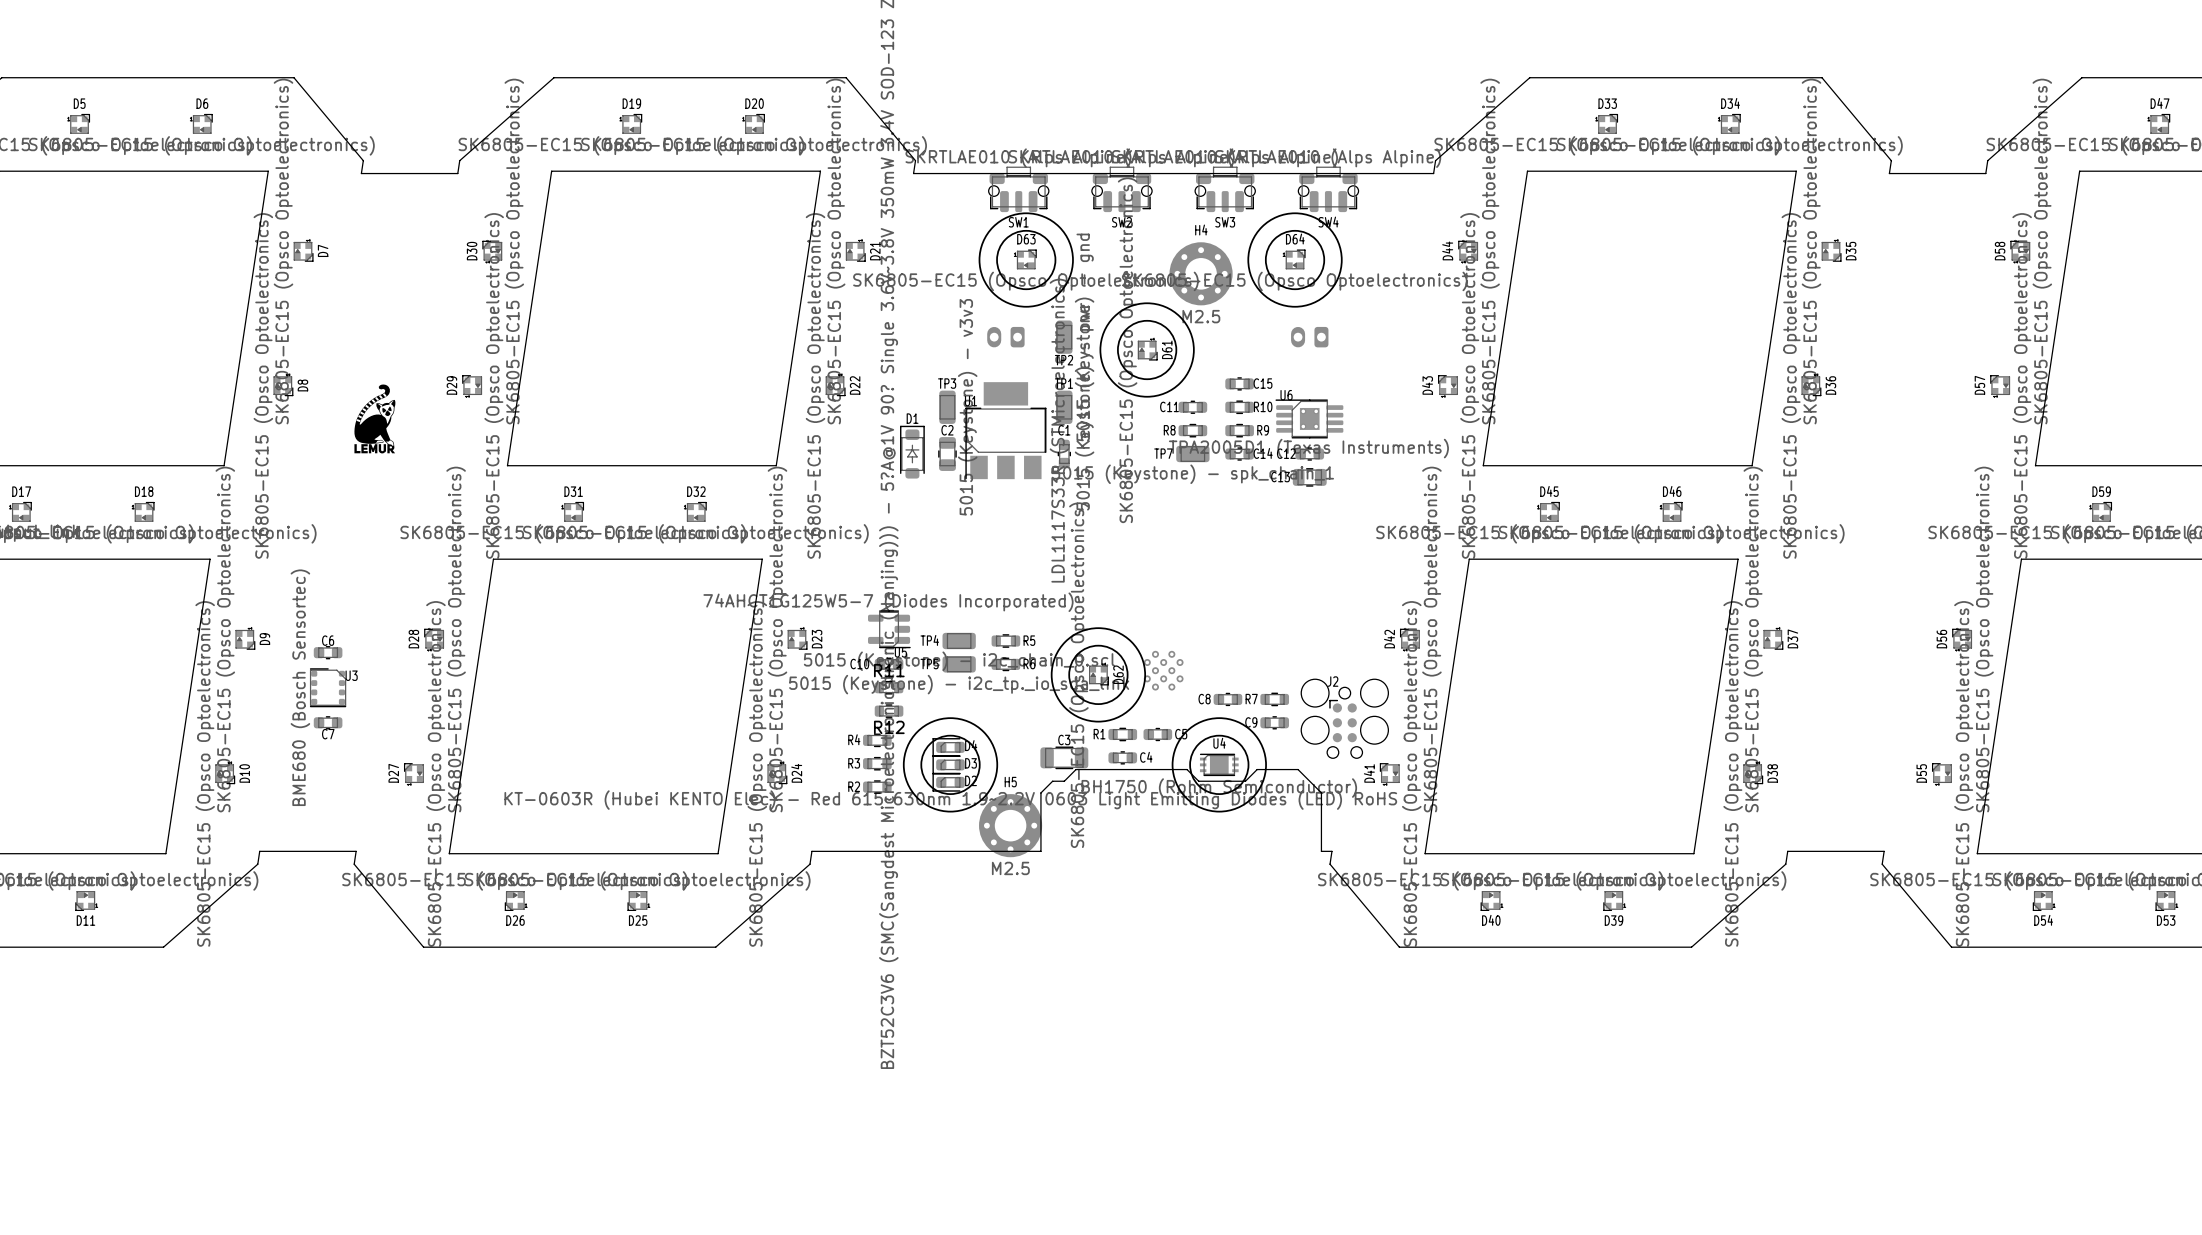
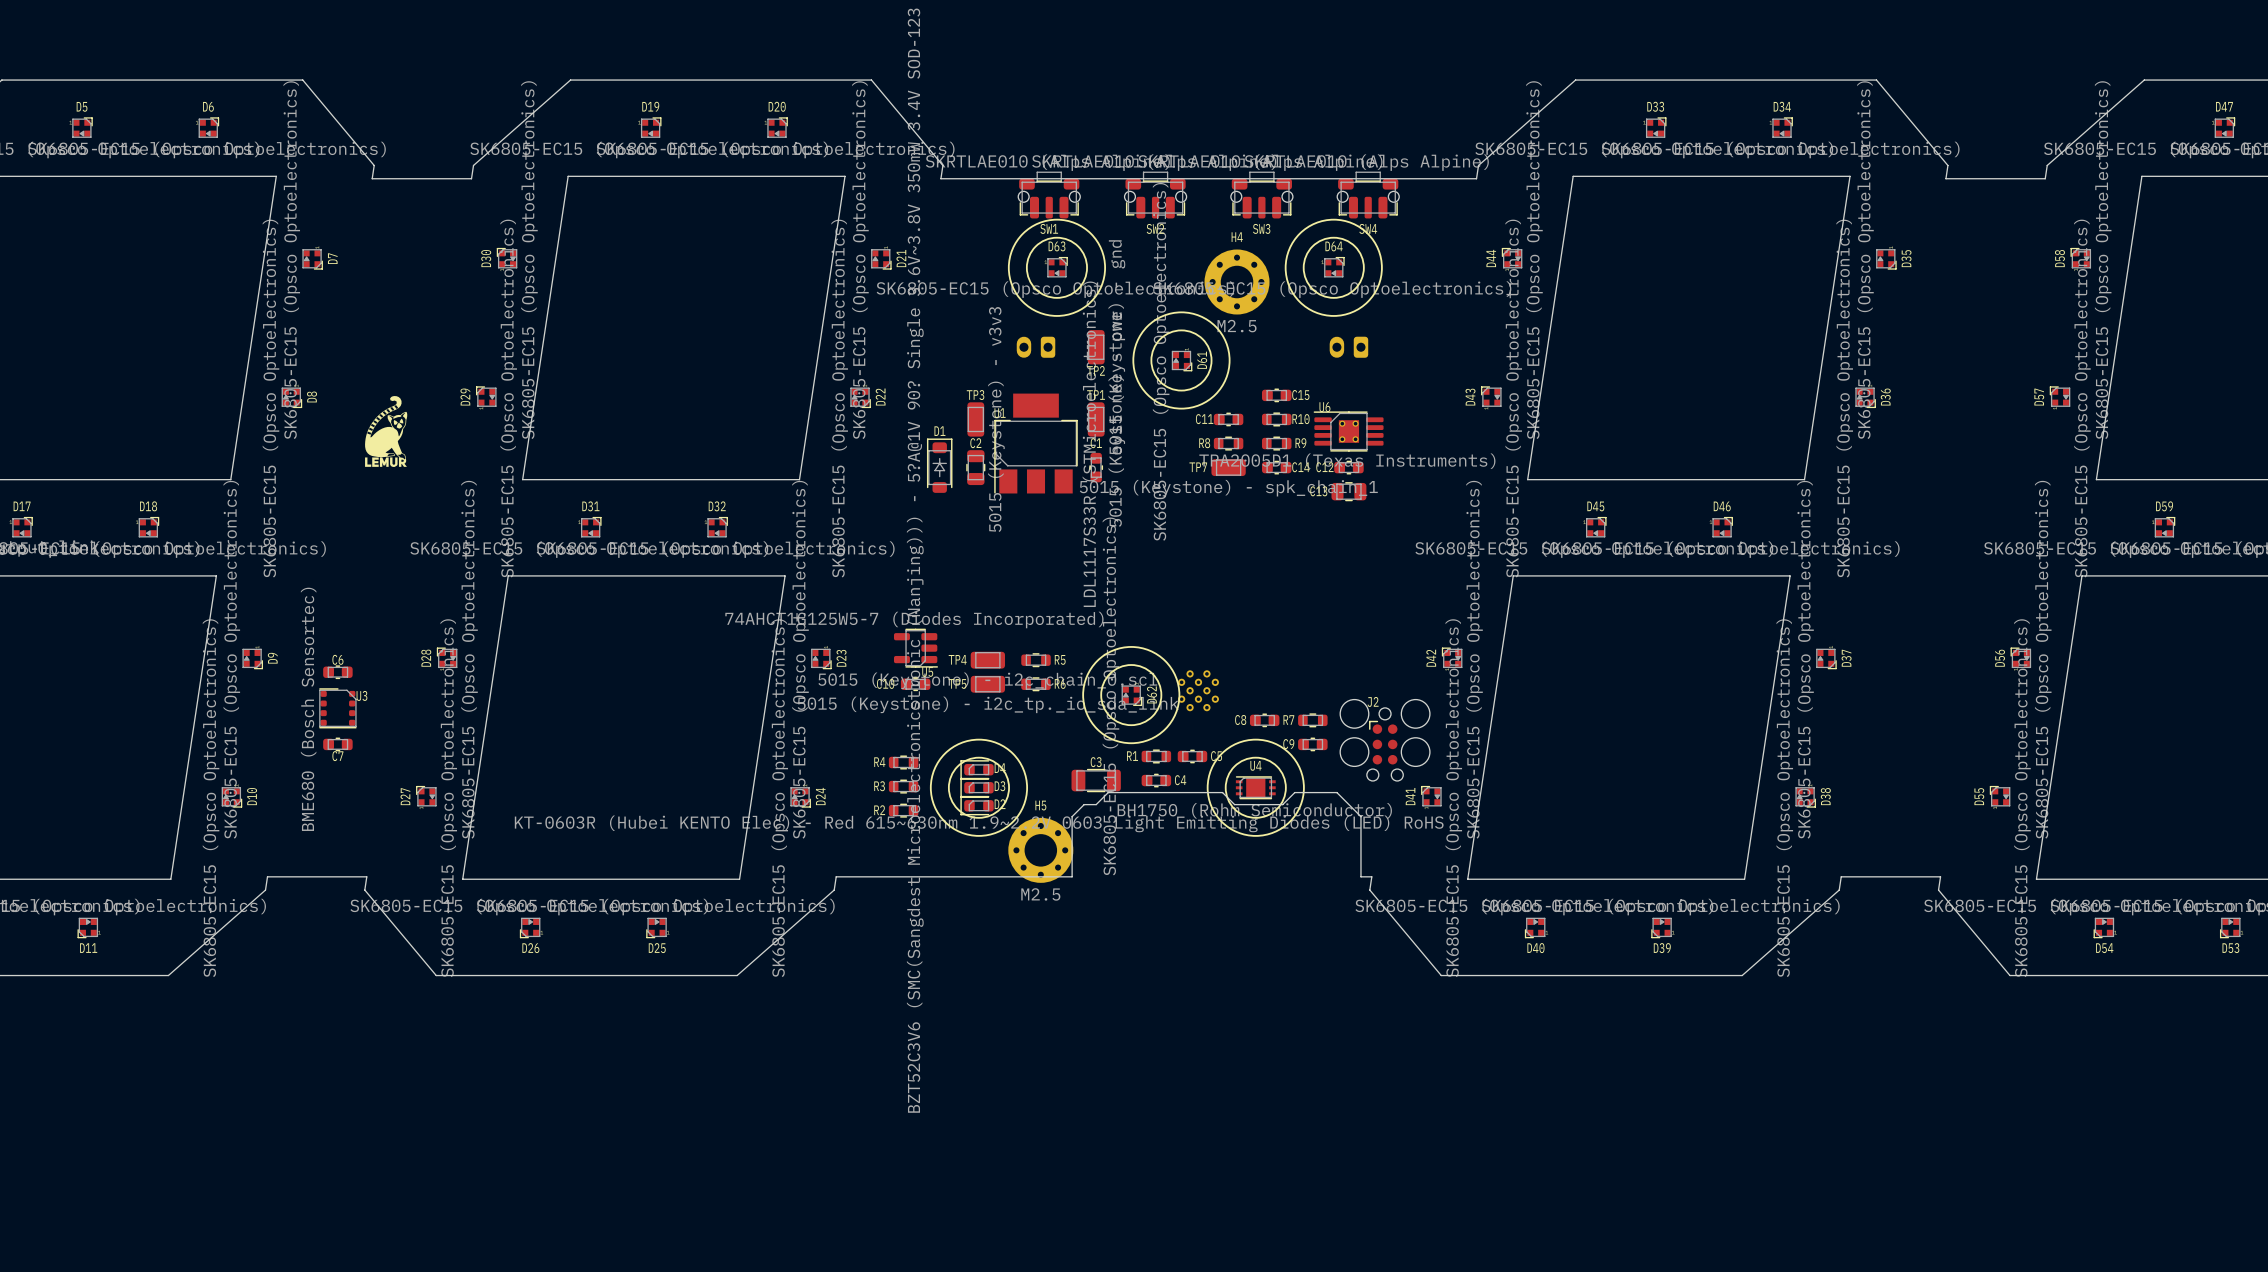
R11: (889, 687) -> none
R12: (889, 711) -> none

